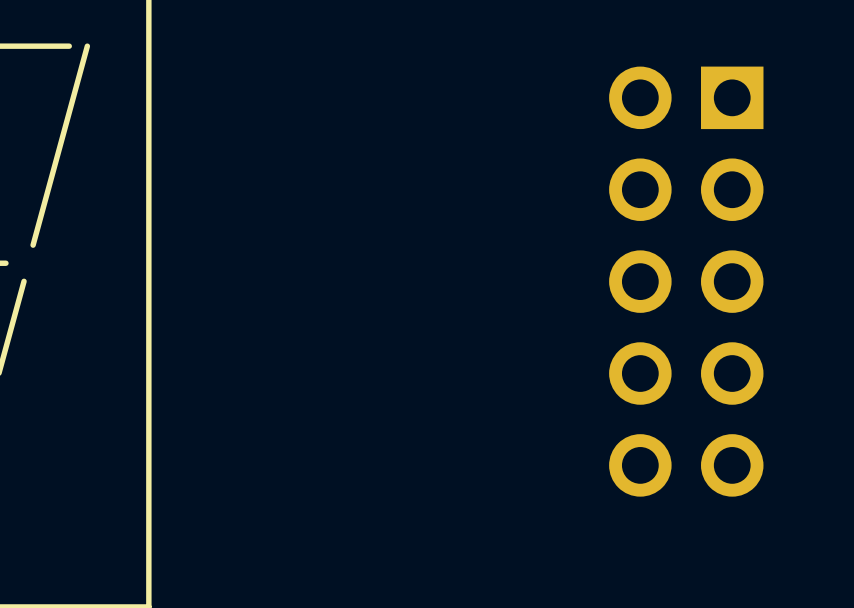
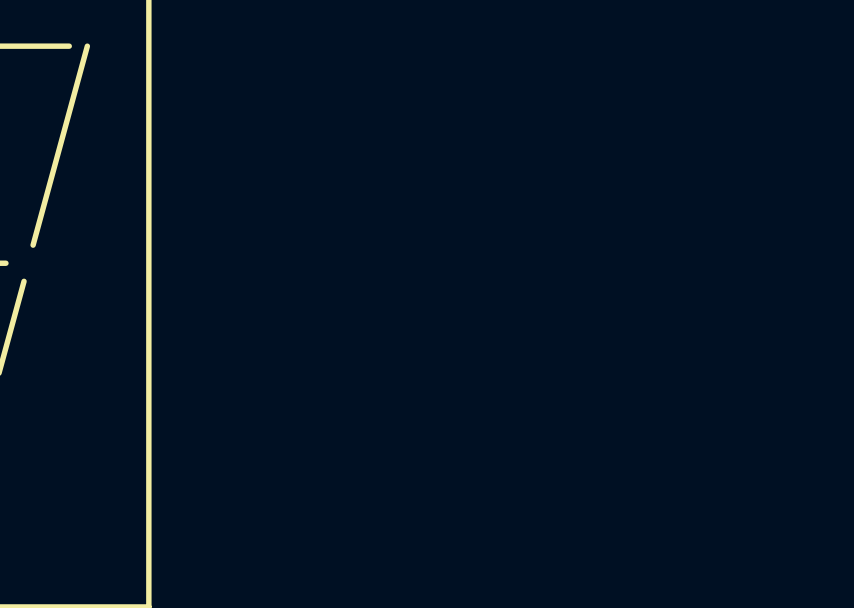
part: (686, 281) -> none

